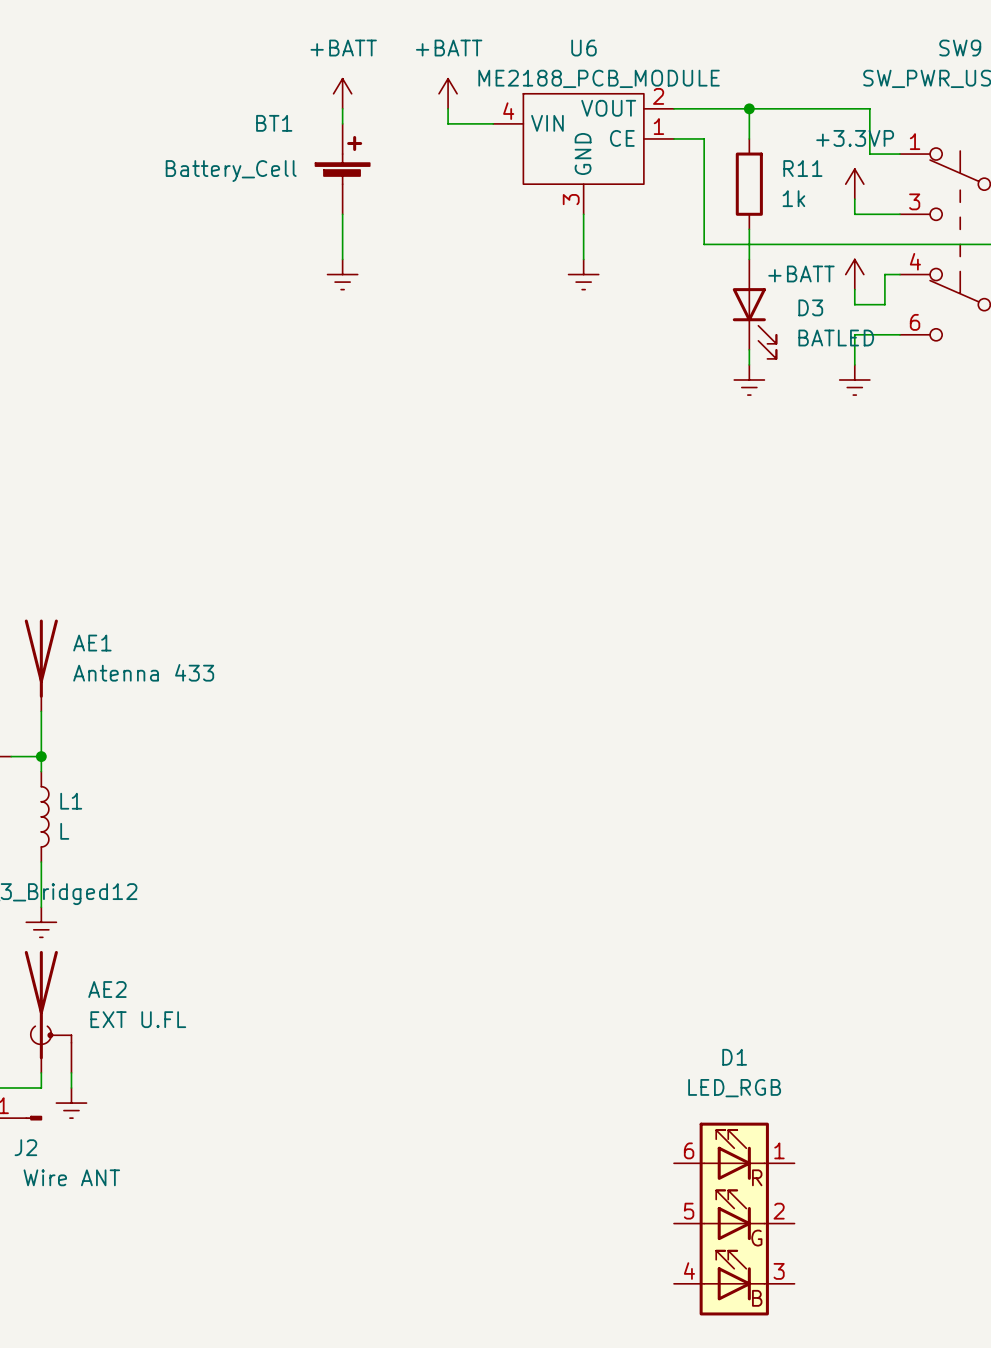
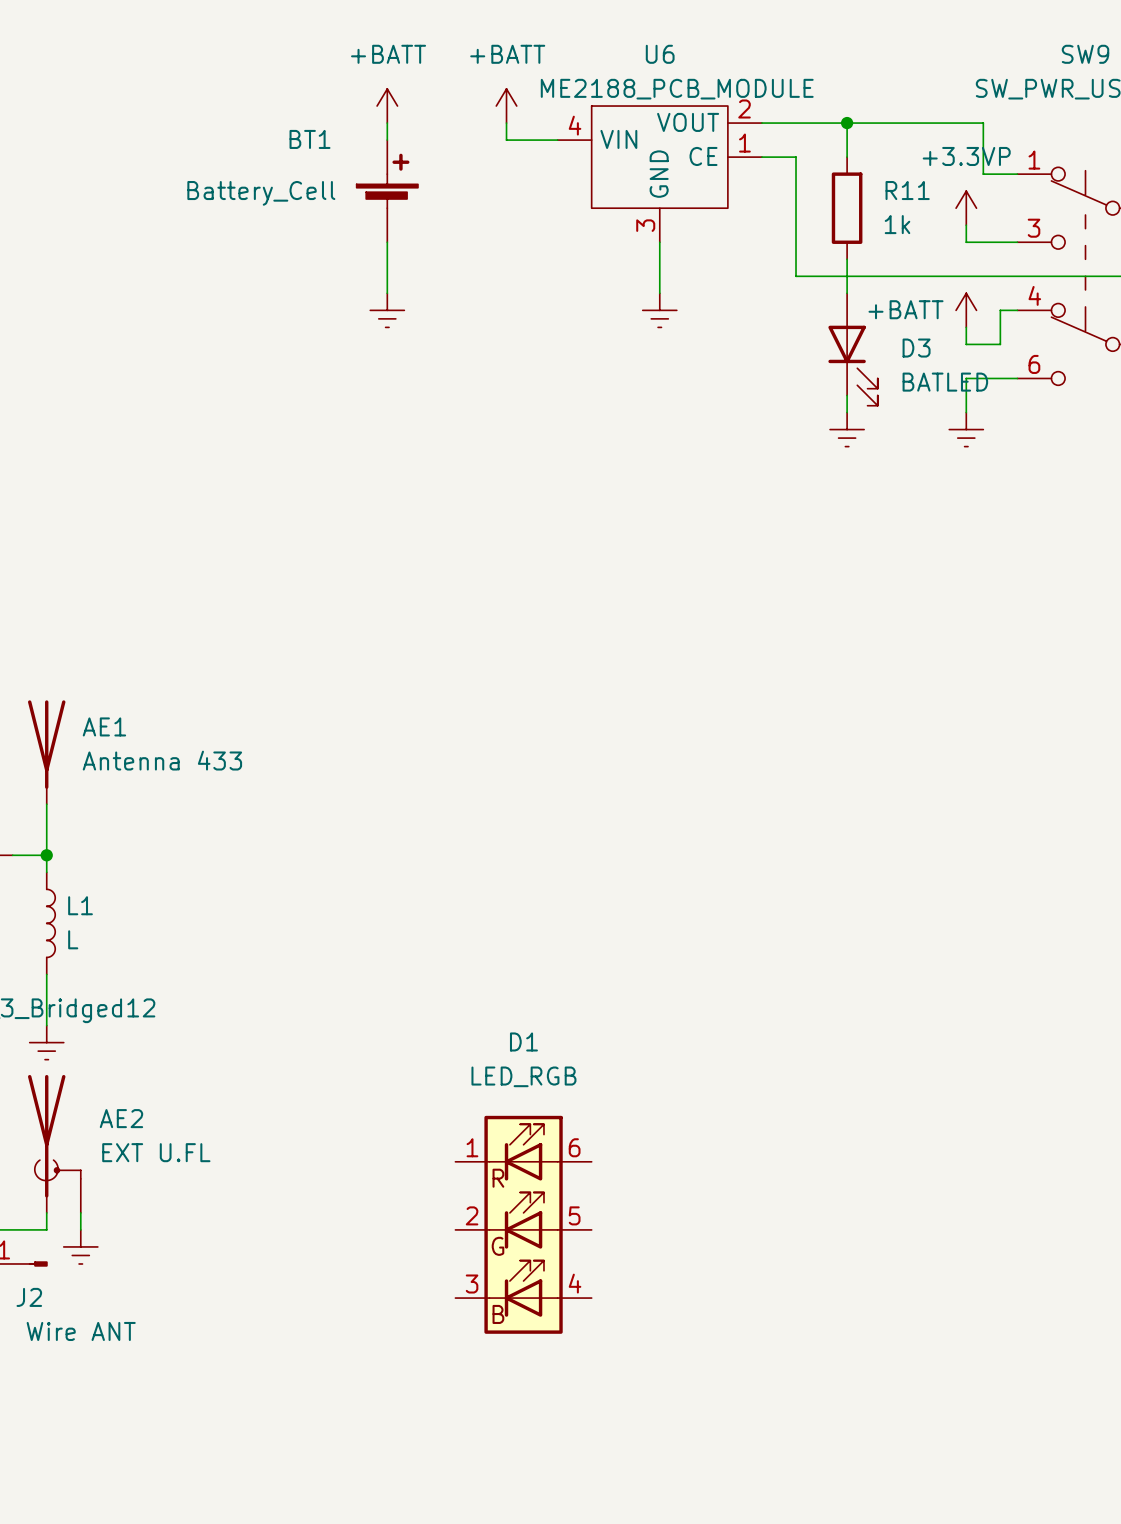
D1 flip: as is (734, 1219) -> left-right (523, 1224)
D1 position: (734, 1219) -> (523, 1224)

